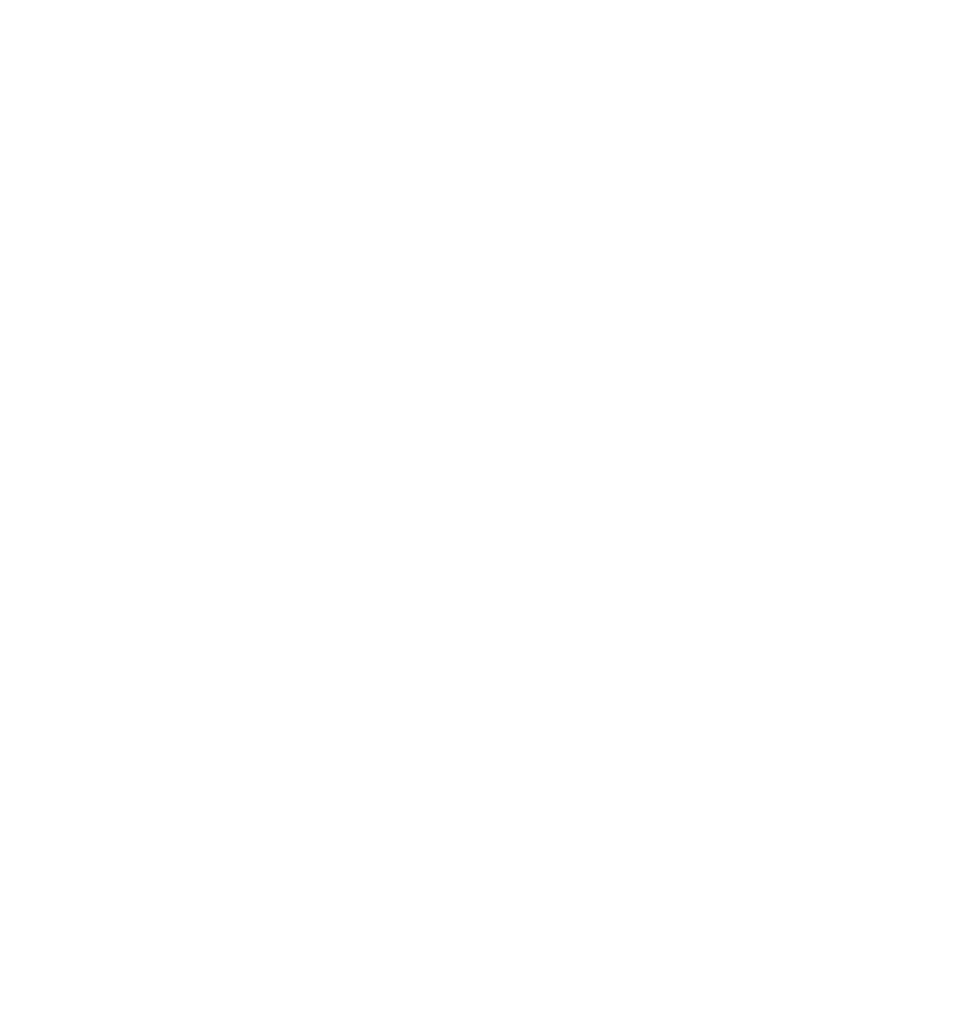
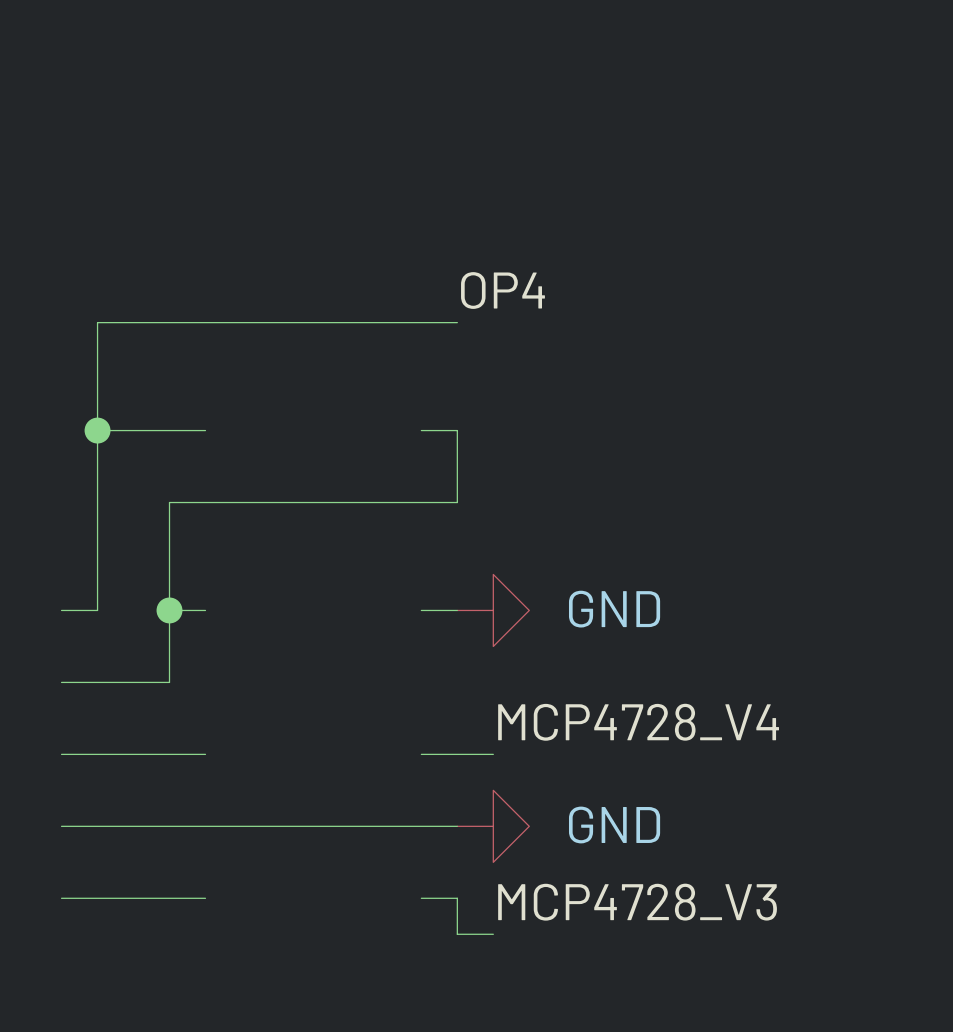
label: none -> OP4 (502, 290)
wire: none -> (457, 322) (97, 322) (97, 610) (61, 610)
wire: none -> (97, 430) (205, 430)
junction: none -> (97, 430)
wire: none -> (421, 430) (457, 430) (457, 502) (169, 502) (169, 682) (61, 682)
wire: none -> (169, 610) (205, 610)
junction: none -> (169, 610)
wire: none -> (421, 610) (457, 610)
power symbol: none -> GND (493, 610)
label: none -> MCP4728_V4 (638, 722)
wire: none -> (61, 754) (205, 754)
wire: none -> (421, 754) (493, 754)
wire: none -> (61, 826) (457, 826)
power symbol: none -> GND (493, 826)
wire: none -> (61, 898) (205, 898)
wire: none -> (421, 898) (457, 898) (457, 934) (493, 934)
label: none -> MCP4728_V3 (637, 902)

